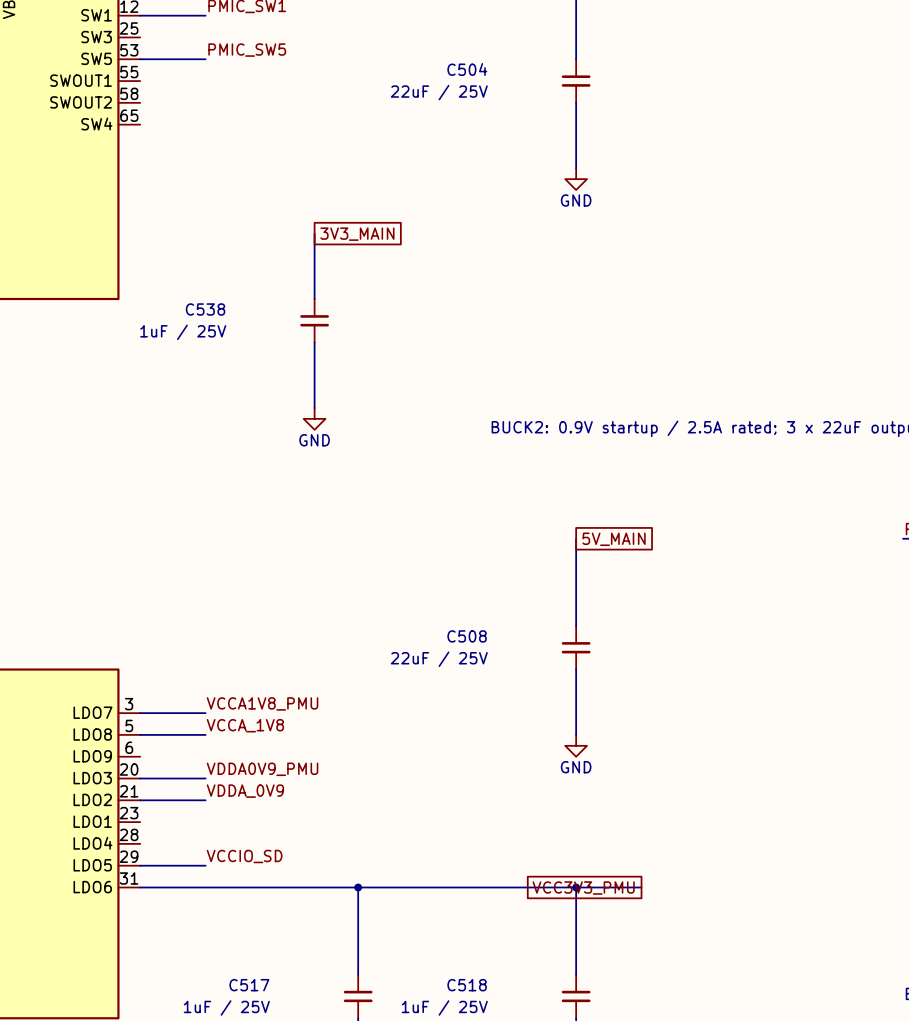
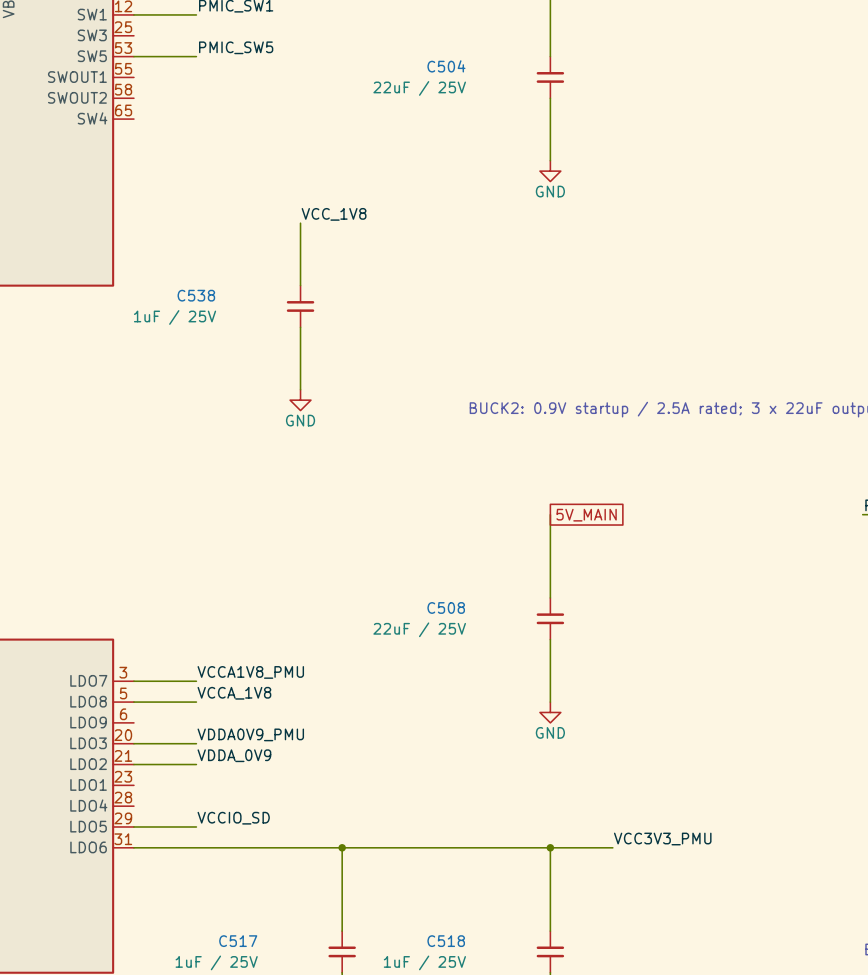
label: none -> VCC_1V8 (334, 214)
global label: 3V3_MAIN (357, 234) -> none
label: none -> VCC3V3_PMU (662, 839)
global label: VCC3V3_PMU (583, 888) -> none

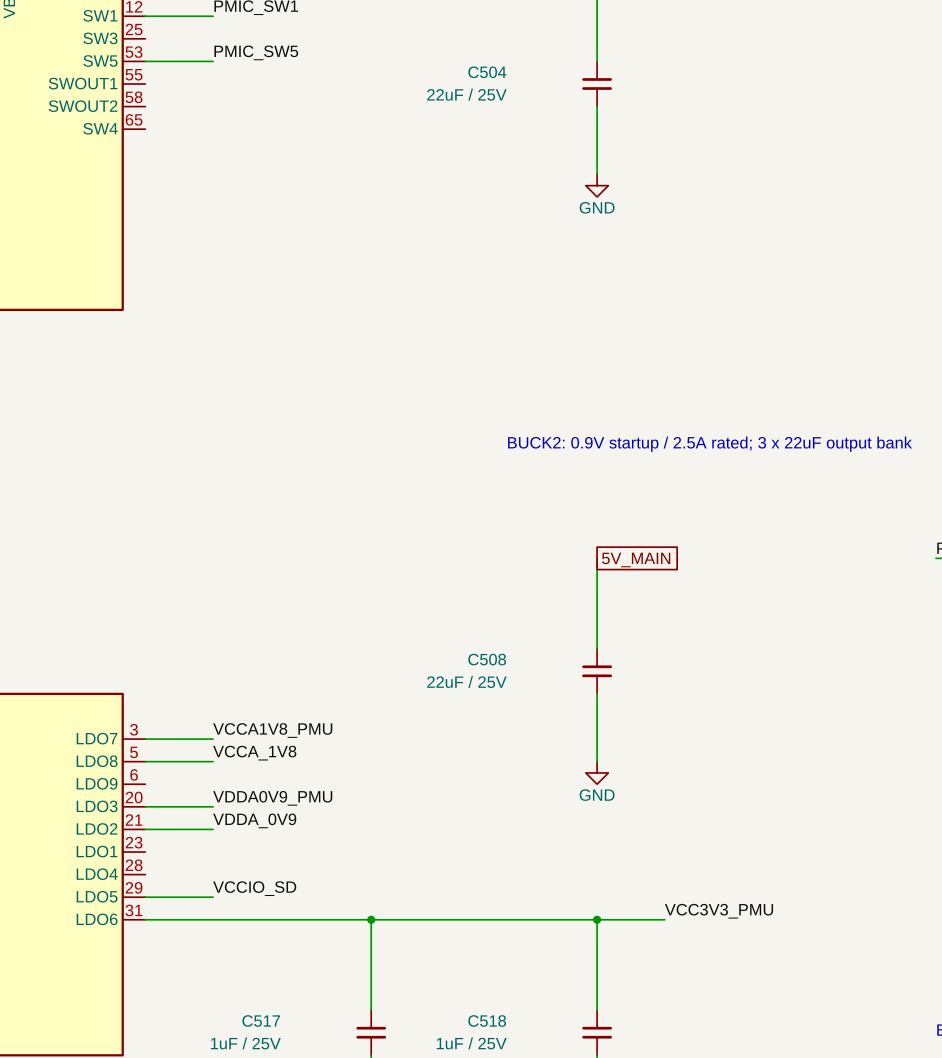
label: VCC_1V8 (334, 214) -> none
wire: (300, 223) (300, 285) -> none
C538: 1uF / 25V (300, 306) -> none
wire: (300, 327) (300, 389) -> none
power symbol: GND (300, 400) -> none

